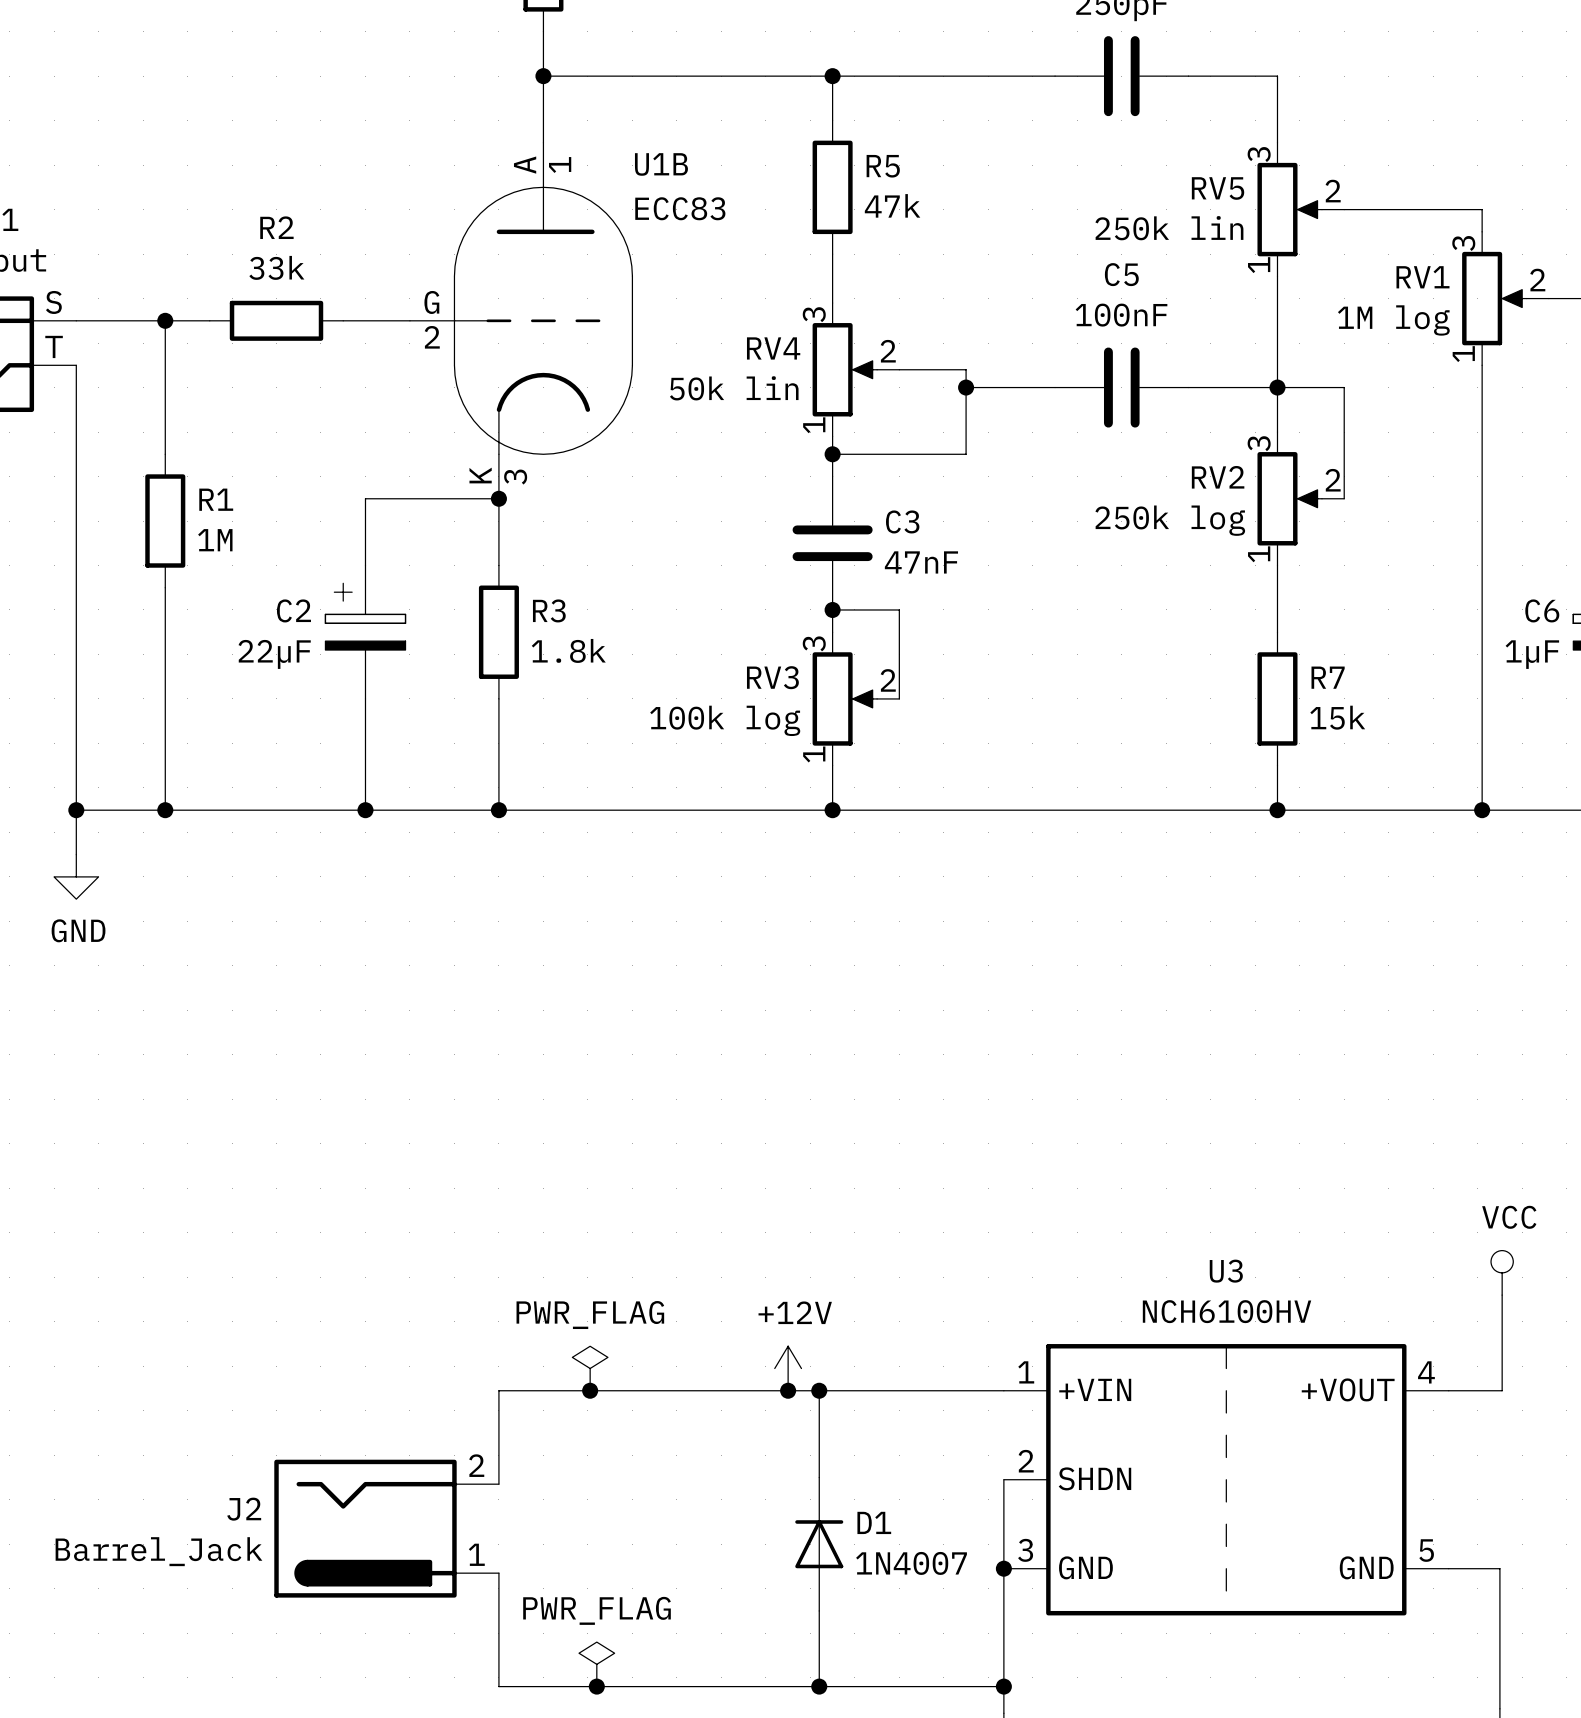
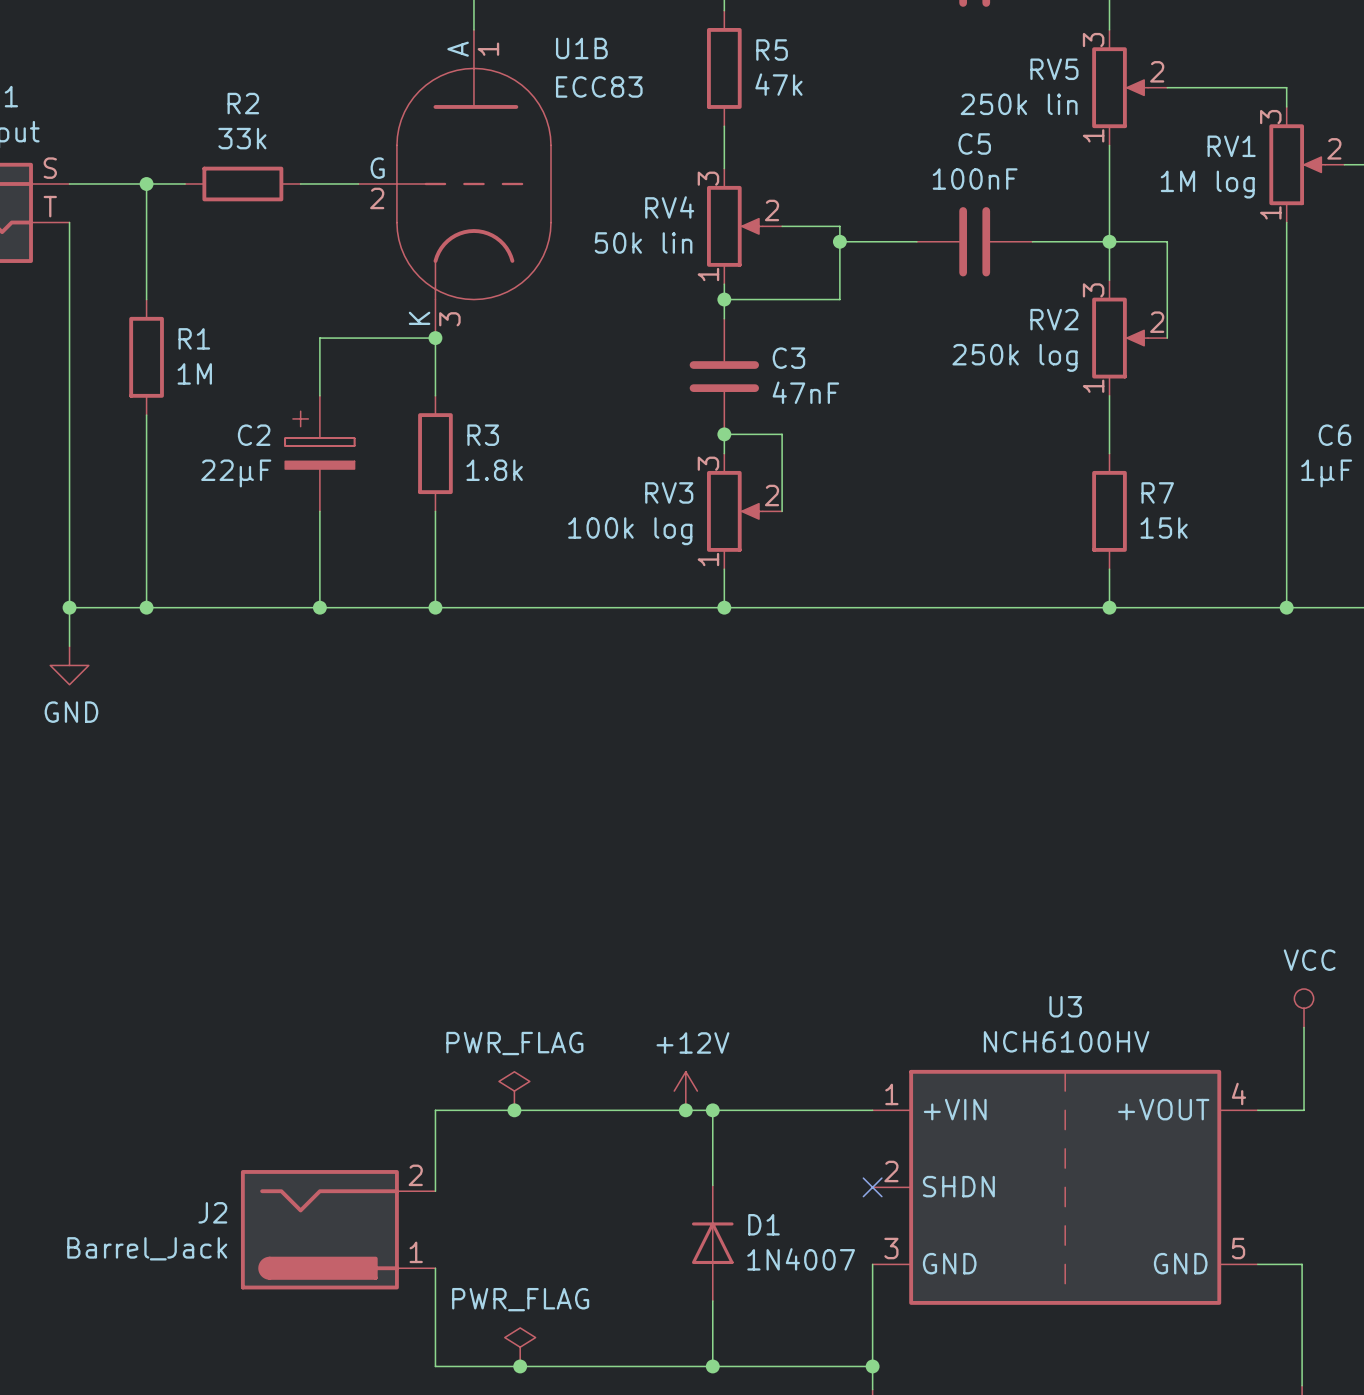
wire: (1003, 1479) (1003, 1568) -> none
no-connect mark: none -> (872, 1187)
junction: (1003, 1568) -> none

